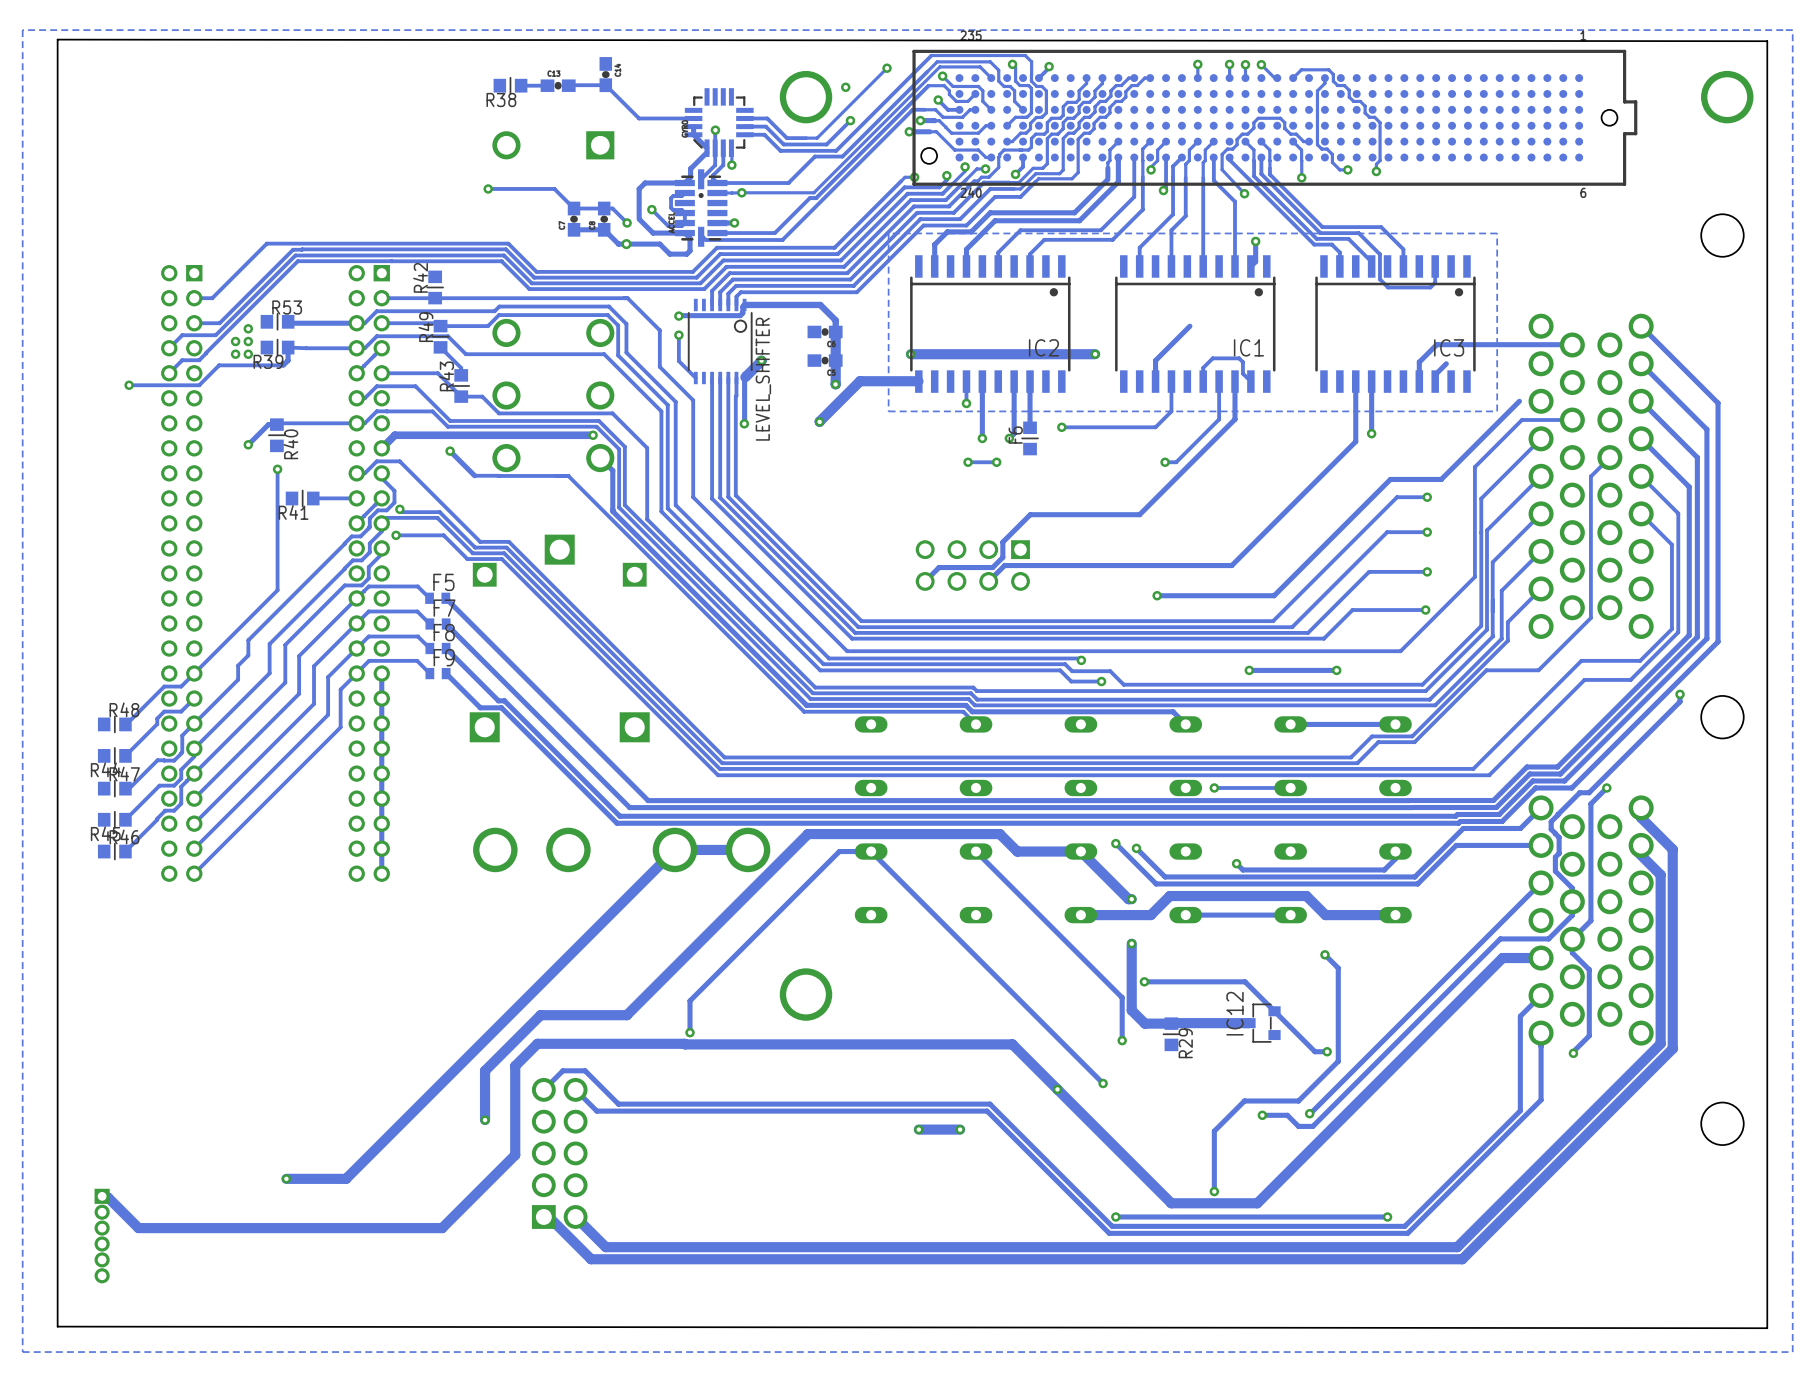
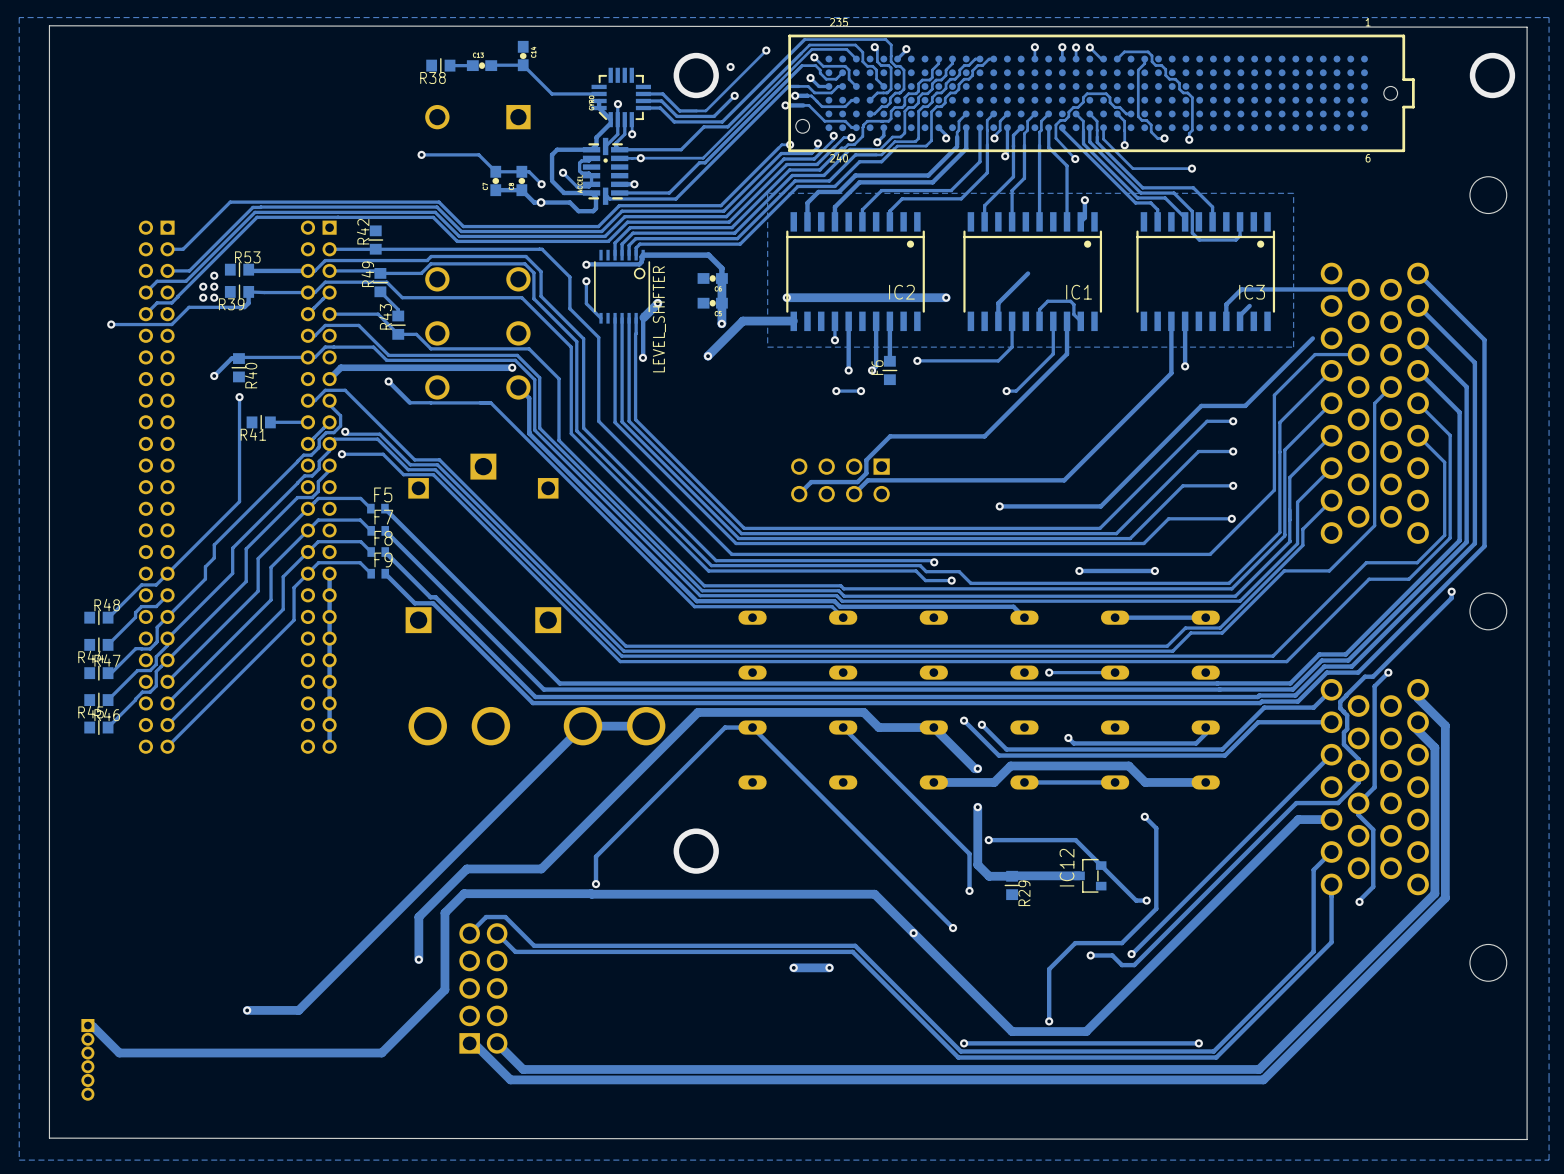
track: none -> (938, 127) (946, 135) (946, 138)
track: none -> (1103, 127) (1103, 139) (1132, 168) (1191, 168)
via: none -> (946, 138)
via: none -> (1191, 168)

